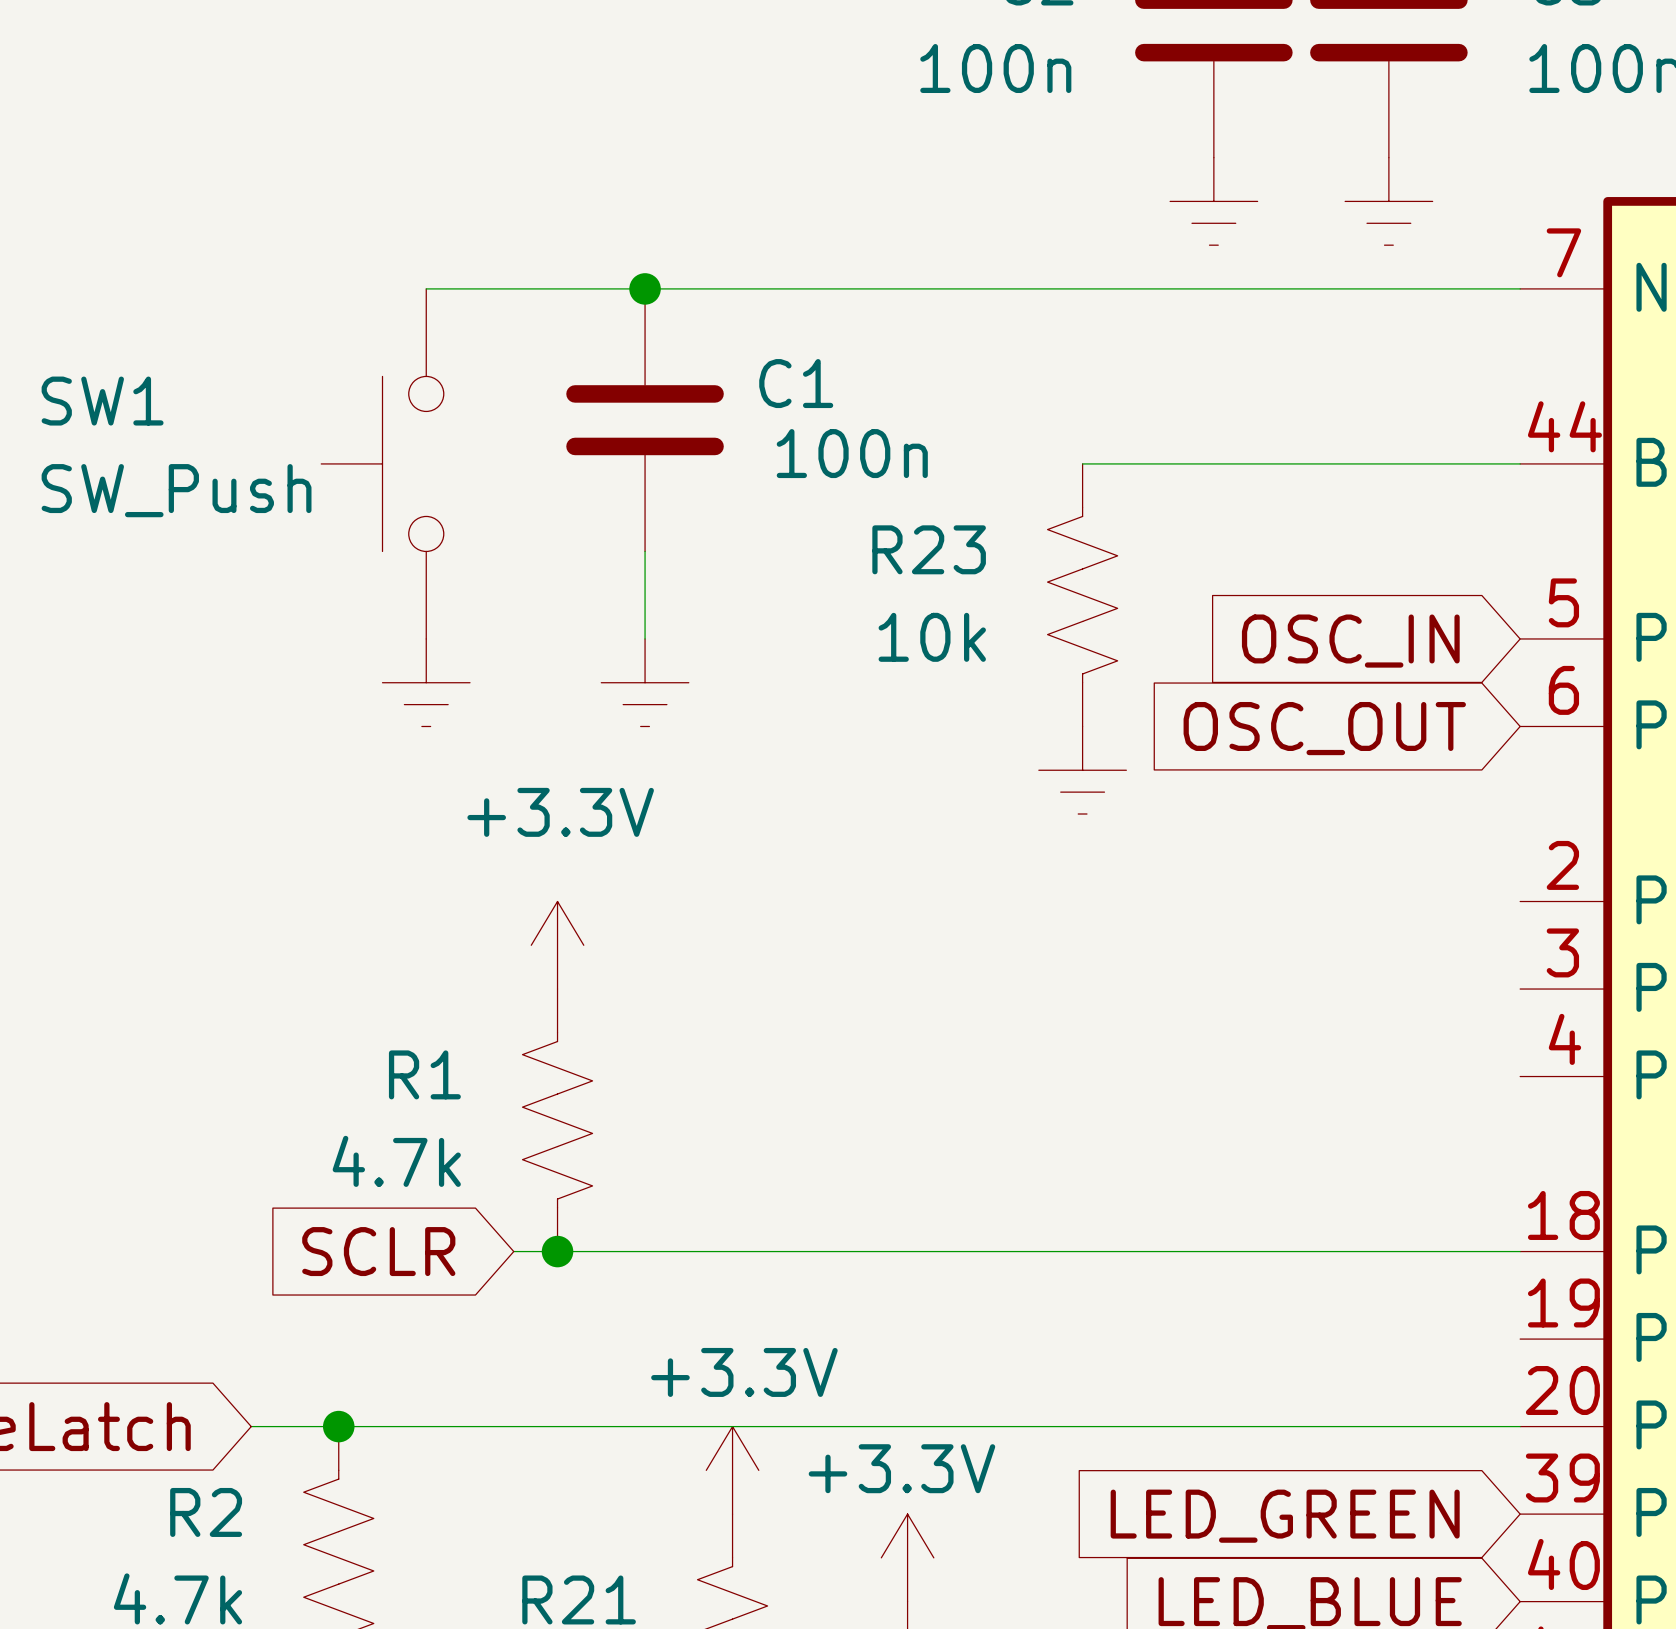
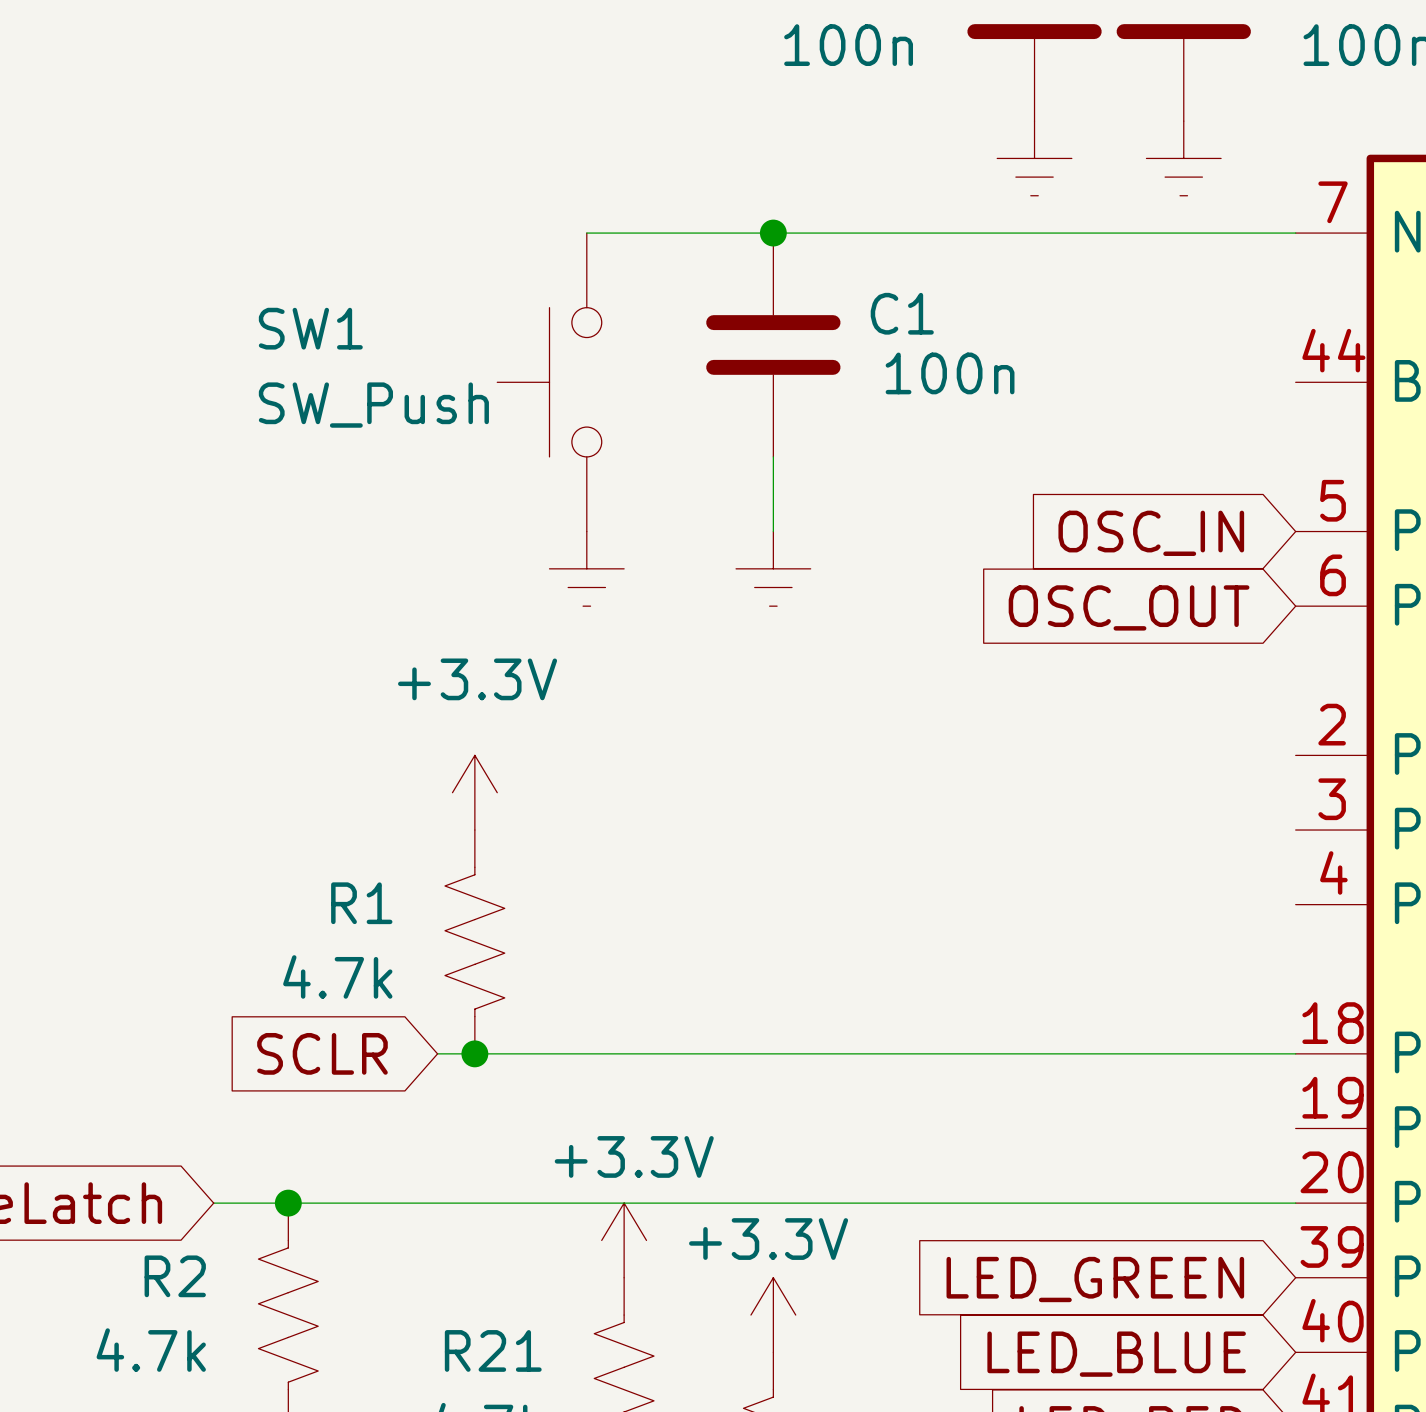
wire: (426, 288) (688, 288) -> none
junction: (645, 288) -> none
junction: none -> (773, 233)
C1 position: (645, 420) -> (773, 344)
SW1 position: (382, 463) -> (549, 382)
wire: (1082, 463) (1520, 463) -> none
wire: (645, 551) (645, 638) -> (773, 456) (773, 531)
R23: 10k (1082, 595) -> none
power symbol: (426, 682) -> none
power symbol position: (645, 682) -> (586, 568)
power symbol: none -> (773, 568)
power symbol: (1082, 770) -> none

